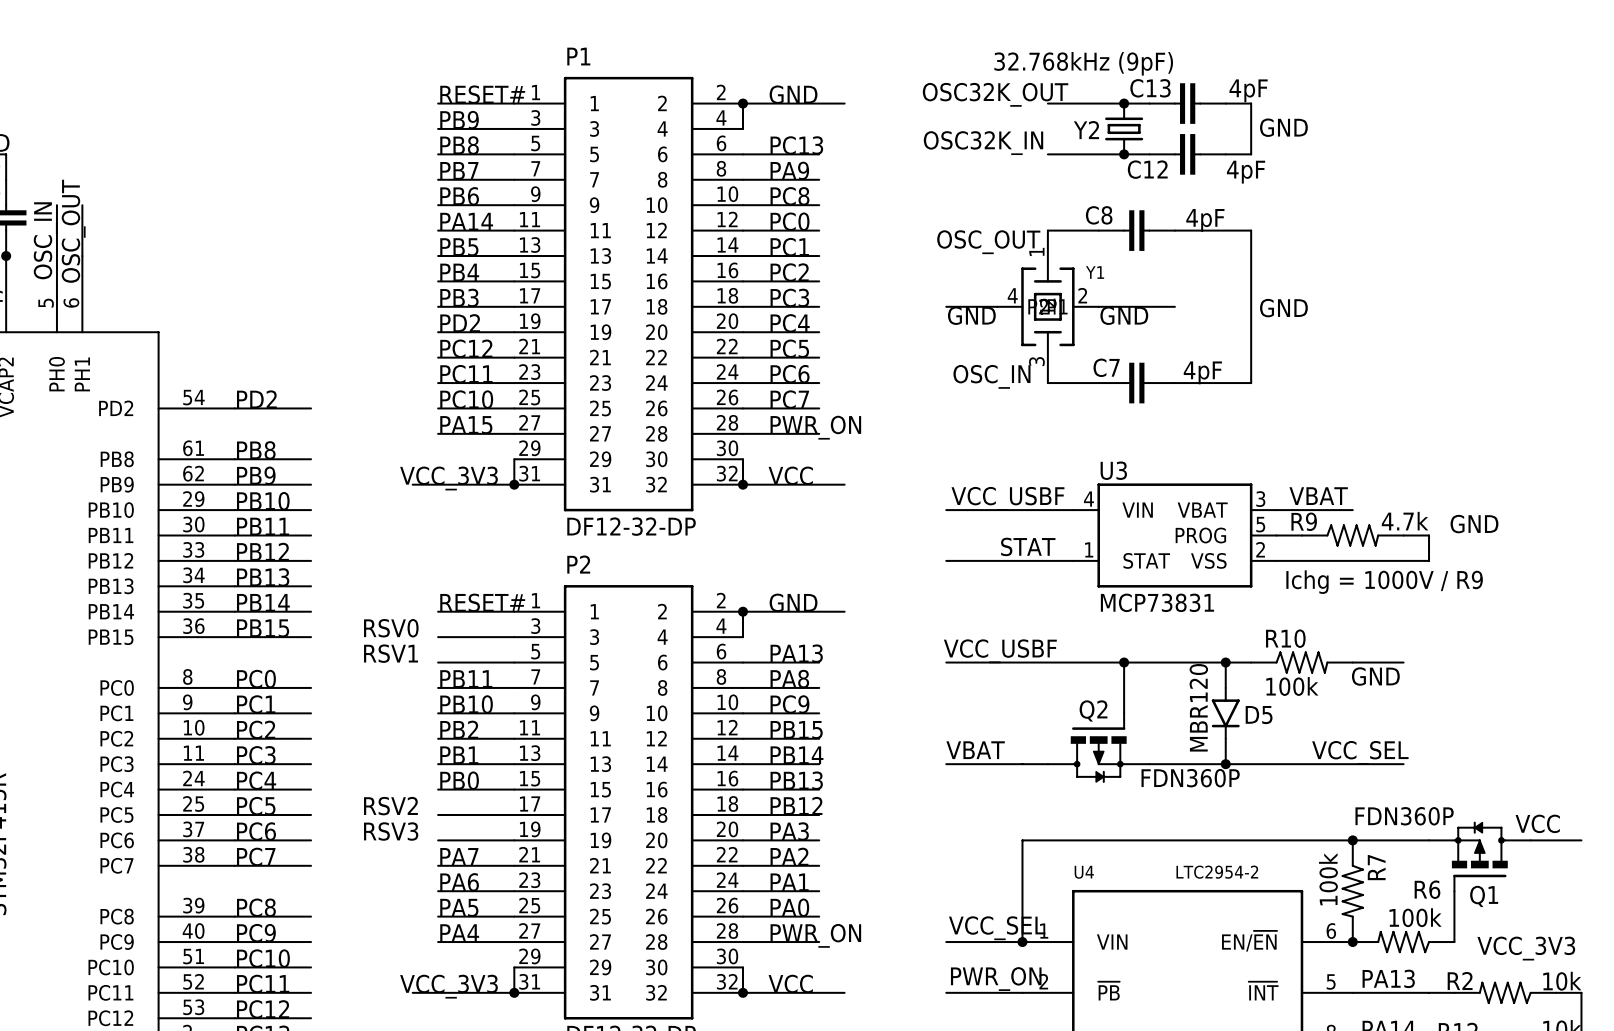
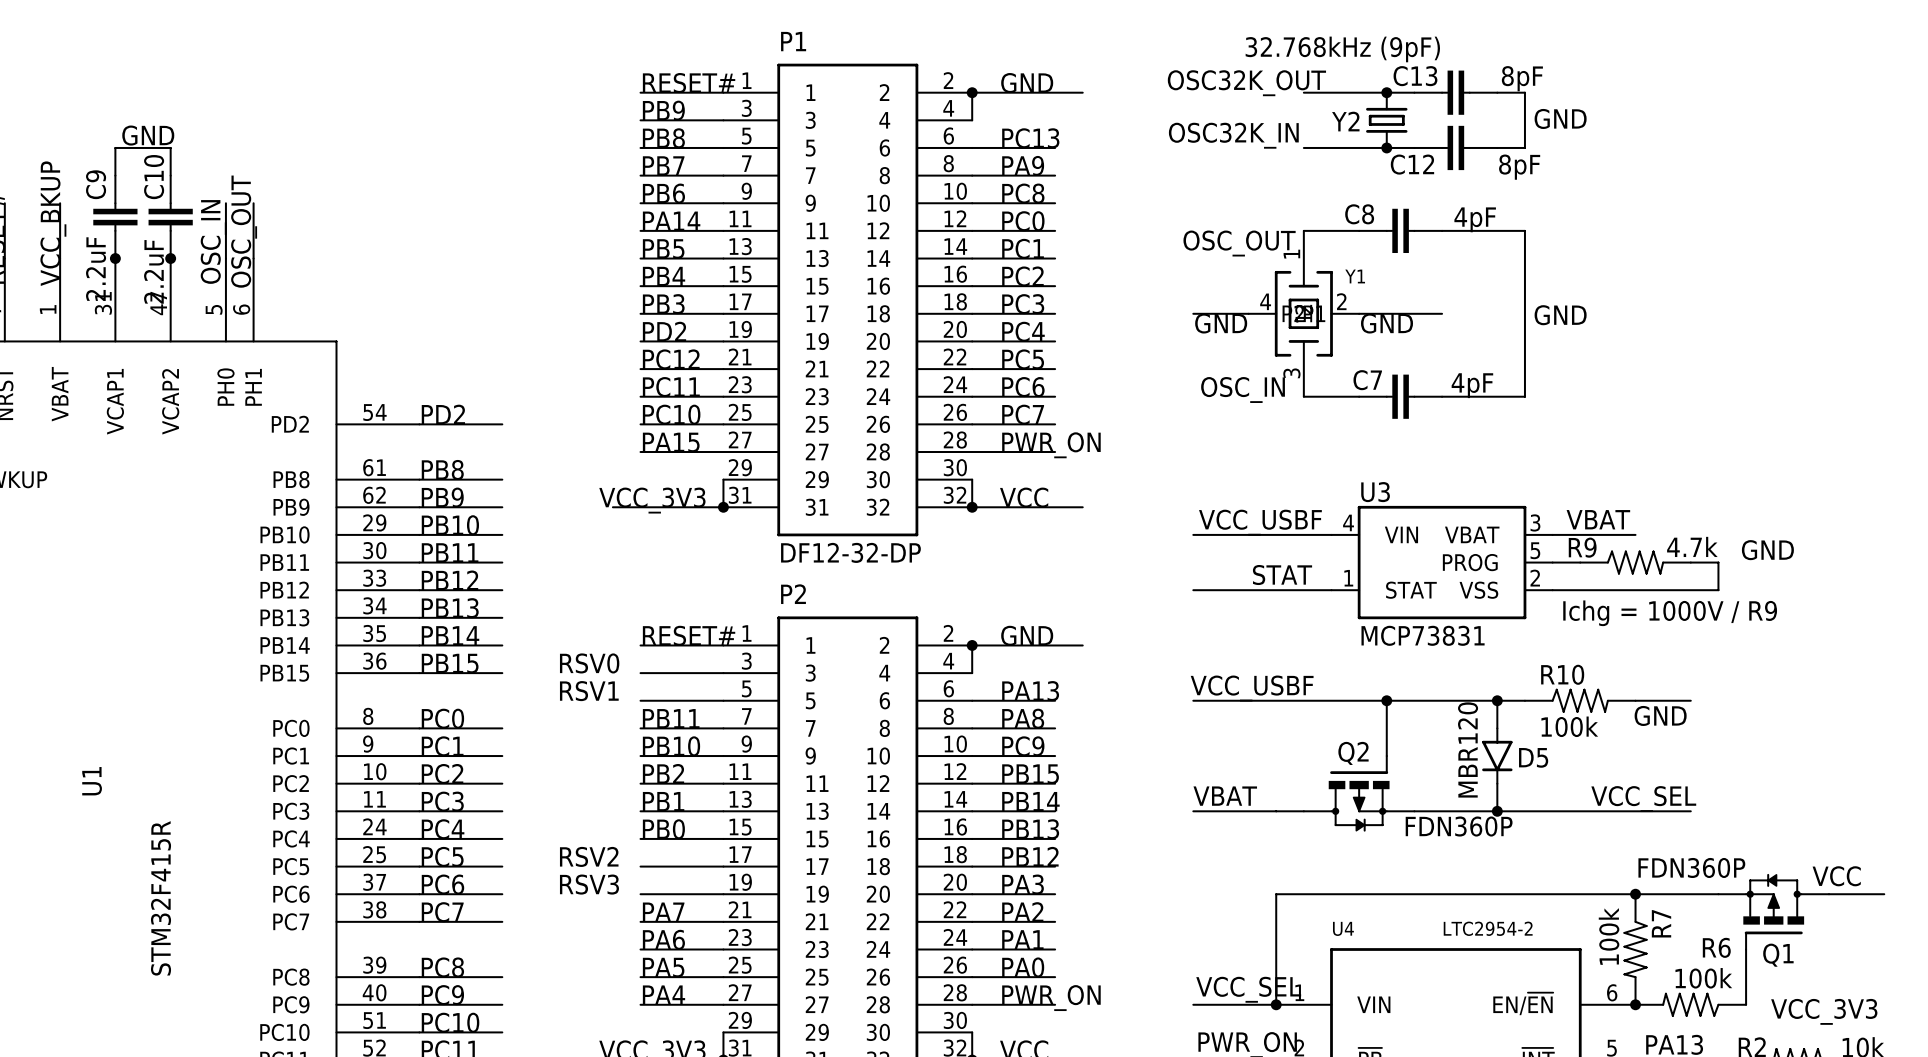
C13 value: 4pF (1248, 90) -> 8pF (1522, 78)
C12 value: 4pF (1246, 172) -> 8pF (1519, 167)

